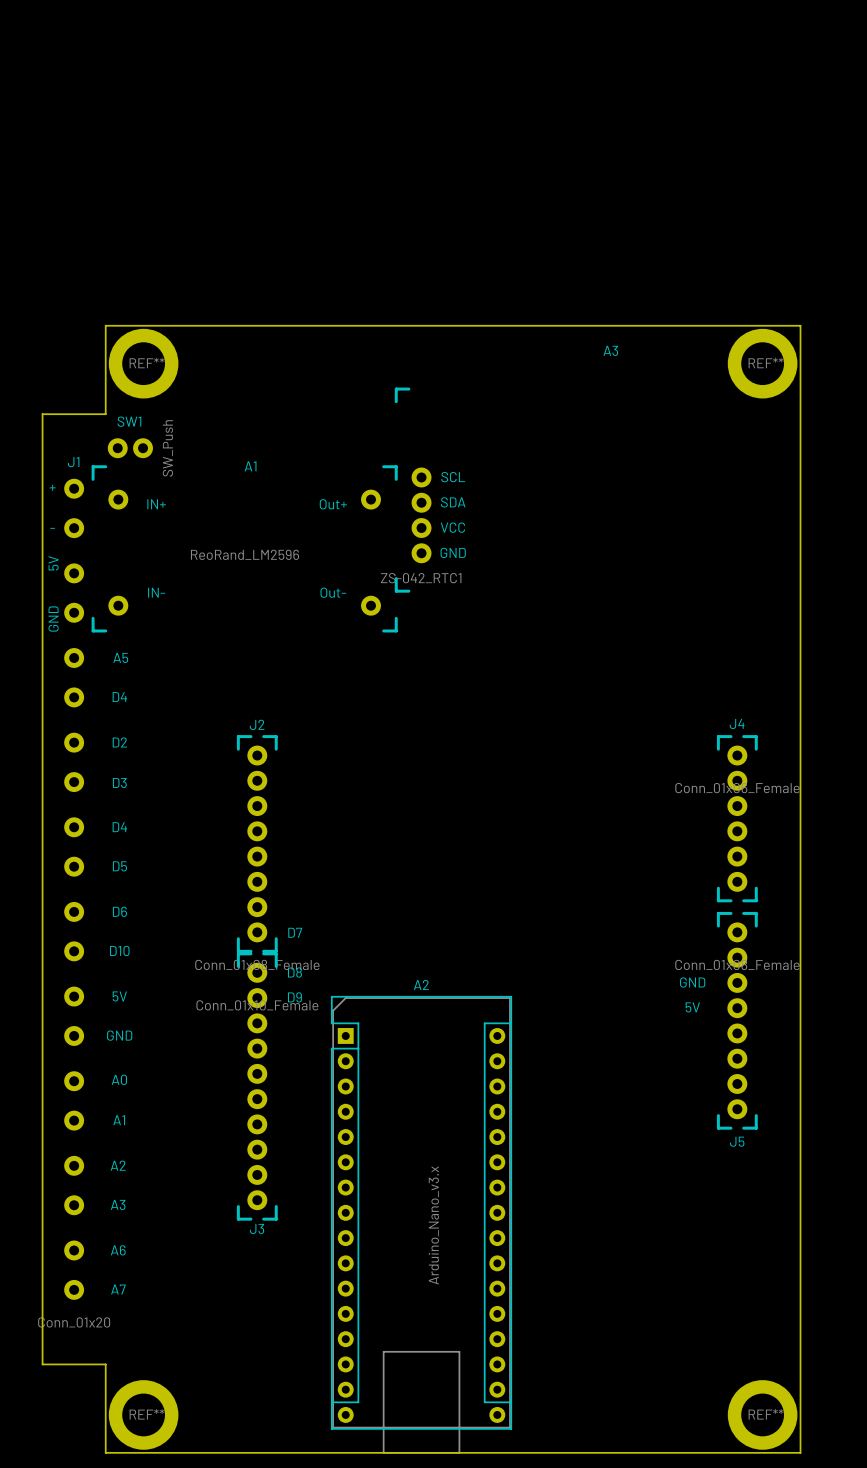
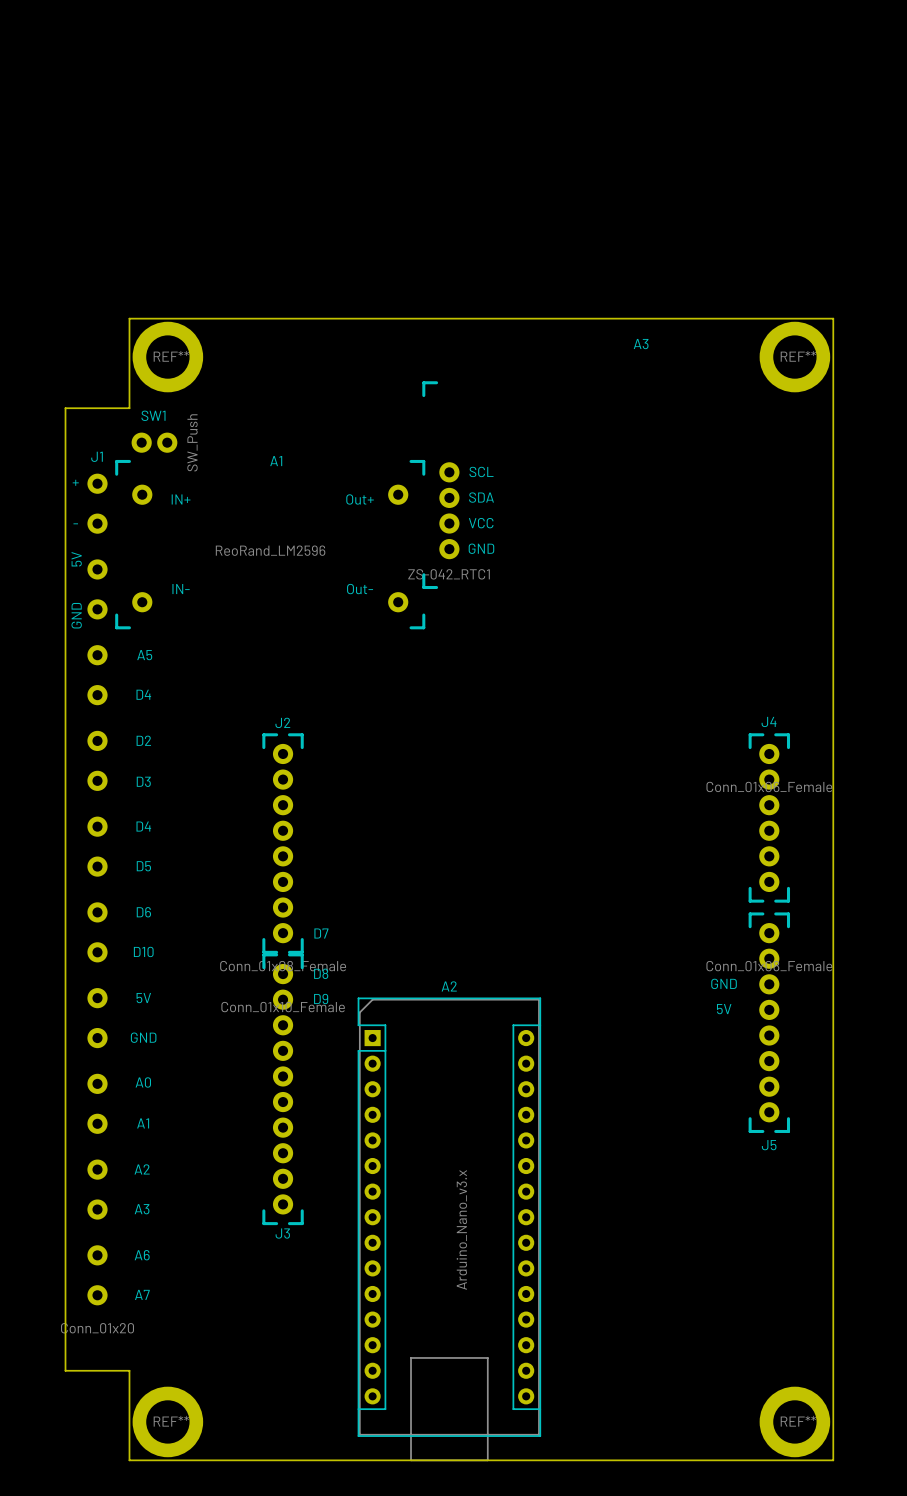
A2 footprint: [331, 996, 512, 1454] -> [357, 997, 541, 1461]

